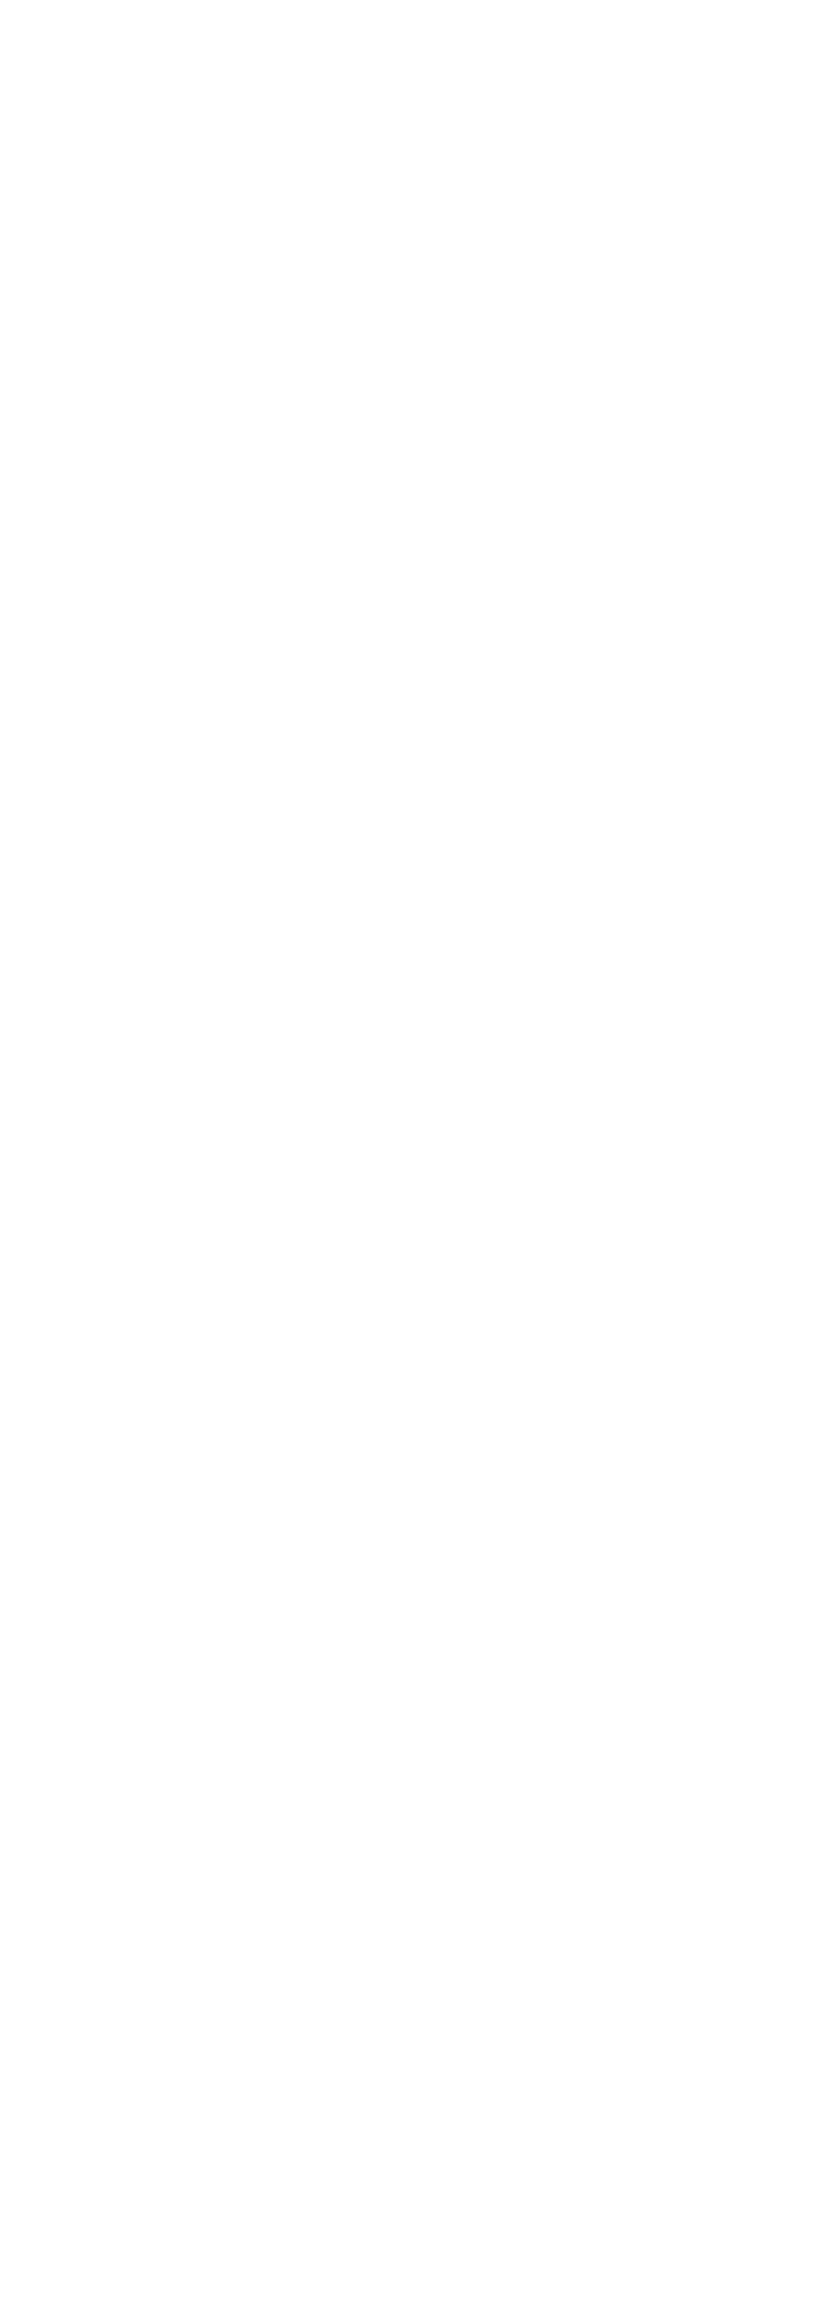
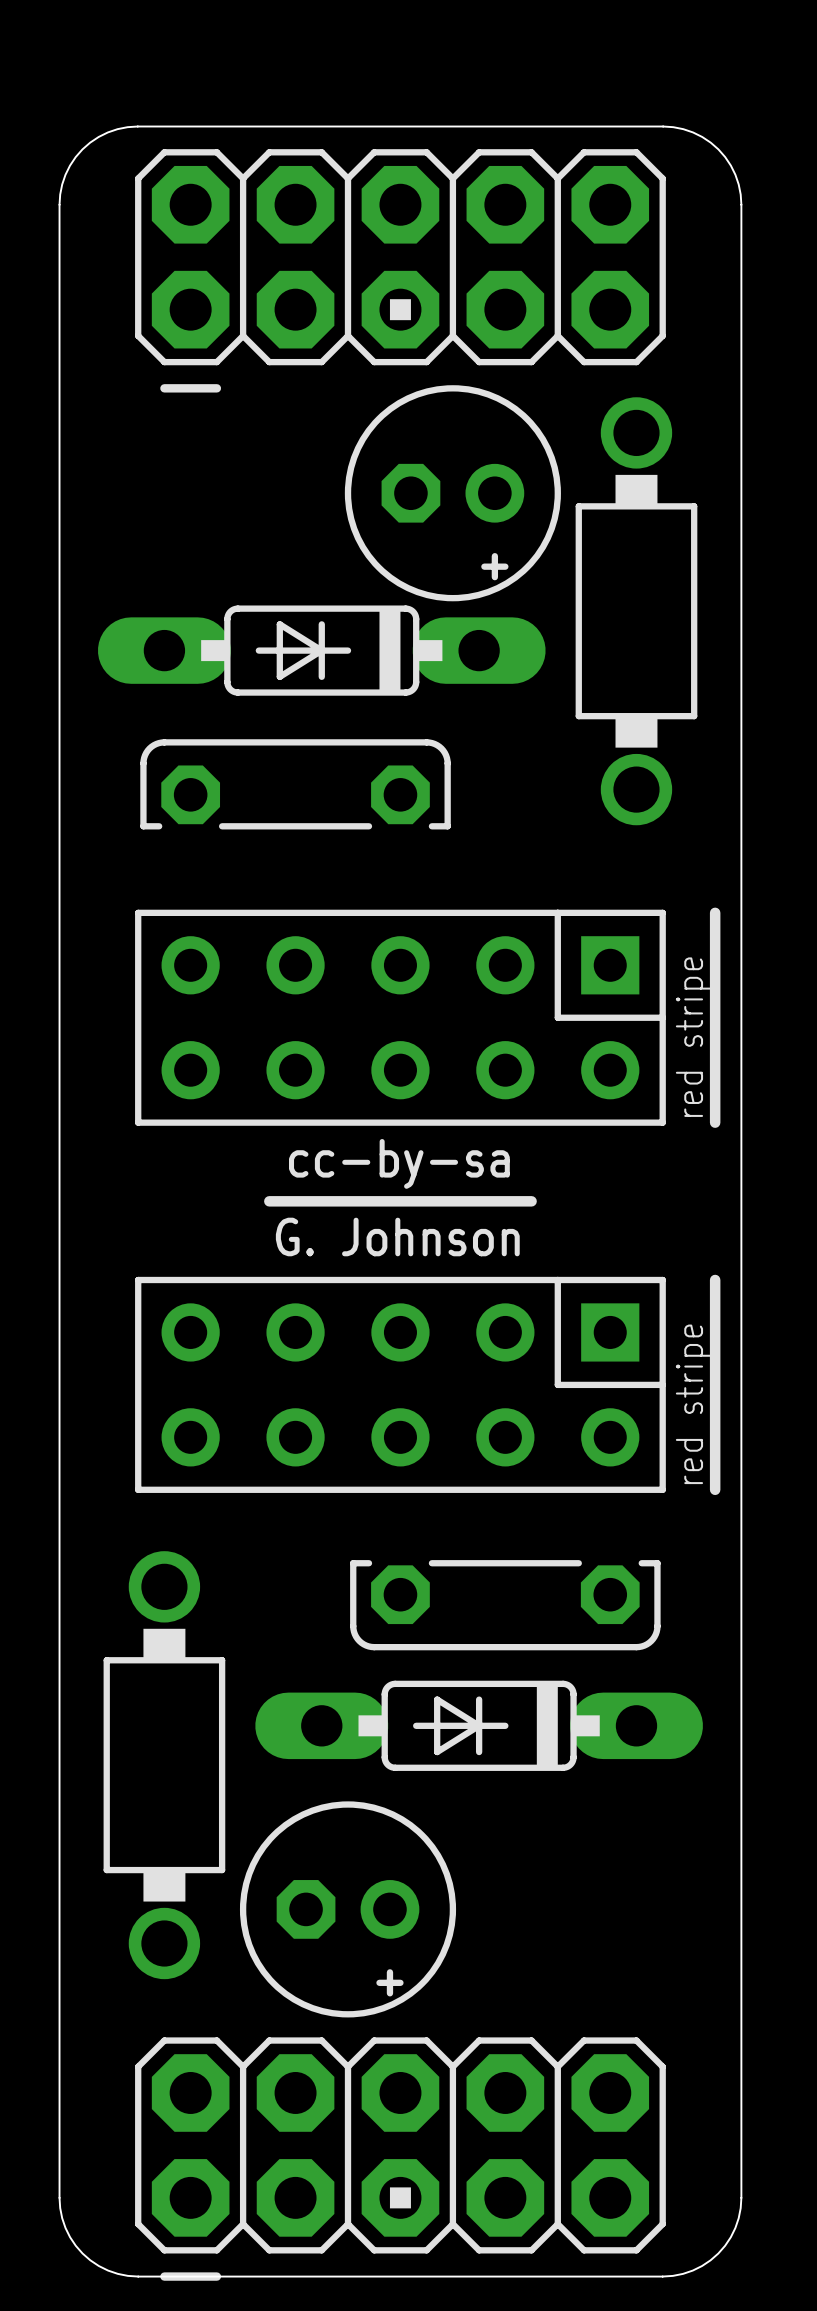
board edge: none -> (137, 126) (673, 127) (693, 132) (718, 149) (730, 165) (738, 184) (741, 204) (741, 2197) (738, 2218) (725, 2245) (702, 2266) (683, 2273) (662, 2276) (127, 2275) (108, 2270) (90, 2260) (70, 2237) (62, 2218) (59, 2197) (59, 204) (65, 174) (82, 149) (107, 132) (137, 126)
part: none -> (400, 270)
part: none -> (452, 493)
part: none -> (636, 611)
part: none -> (321, 650)
part: none -> (295, 784)
line: none -> (715, 912) (715, 1122)
part: none -> (400, 1017)
text: none -> red stripe (693, 1037)
text: none -> cc-by-sa (399, 1163)
line: none -> (269, 1201) (531, 1201)
text: none -> G. Johnson (397, 1236)
line: none -> (715, 1280) (715, 1489)
part: none -> (400, 1384)
text: none -> red stripe (693, 1404)
part: none -> (505, 1605)
part: none -> (479, 1725)
part: none -> (164, 1765)
part: none -> (348, 1909)
part: none -> (400, 2159)

